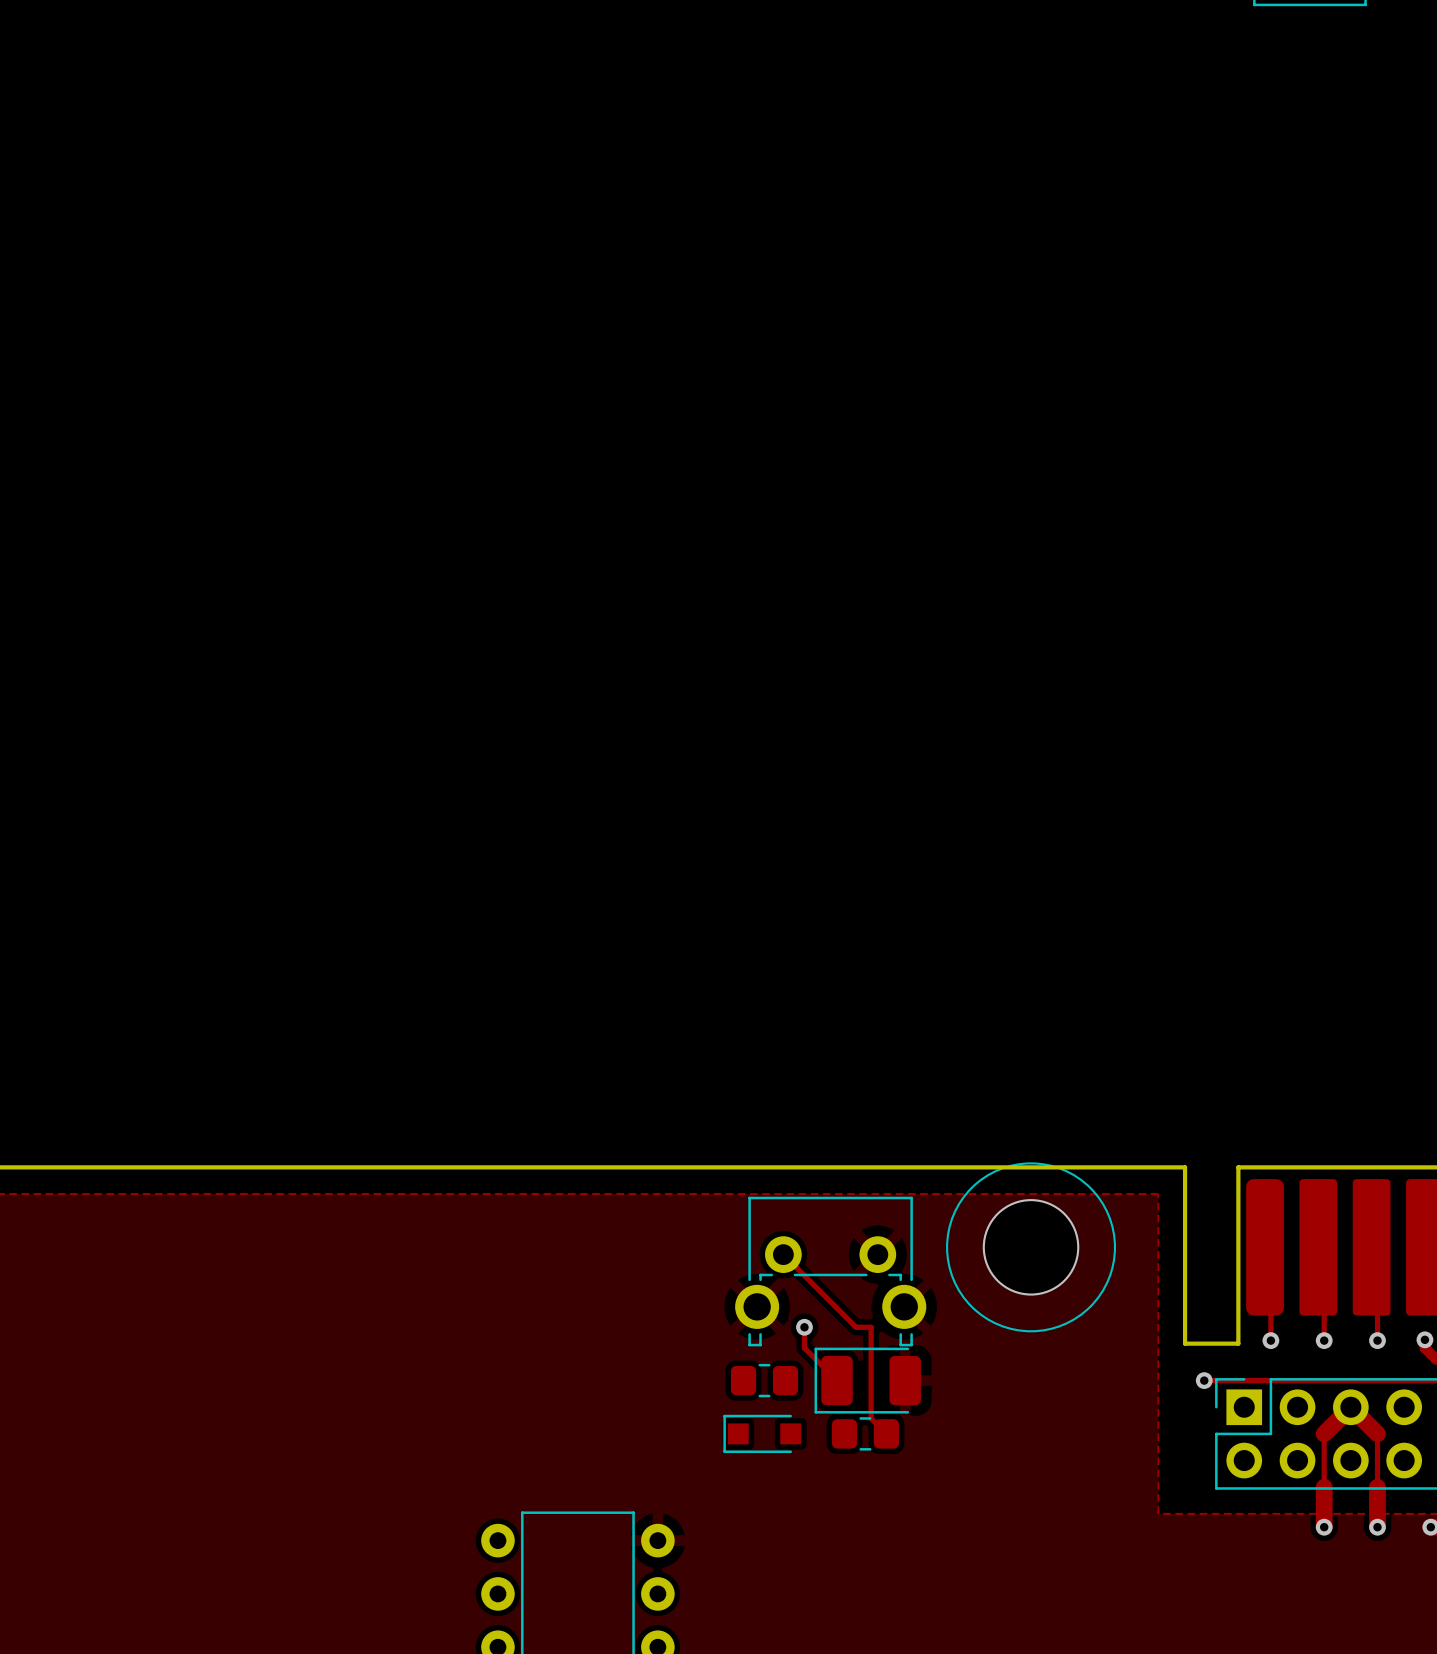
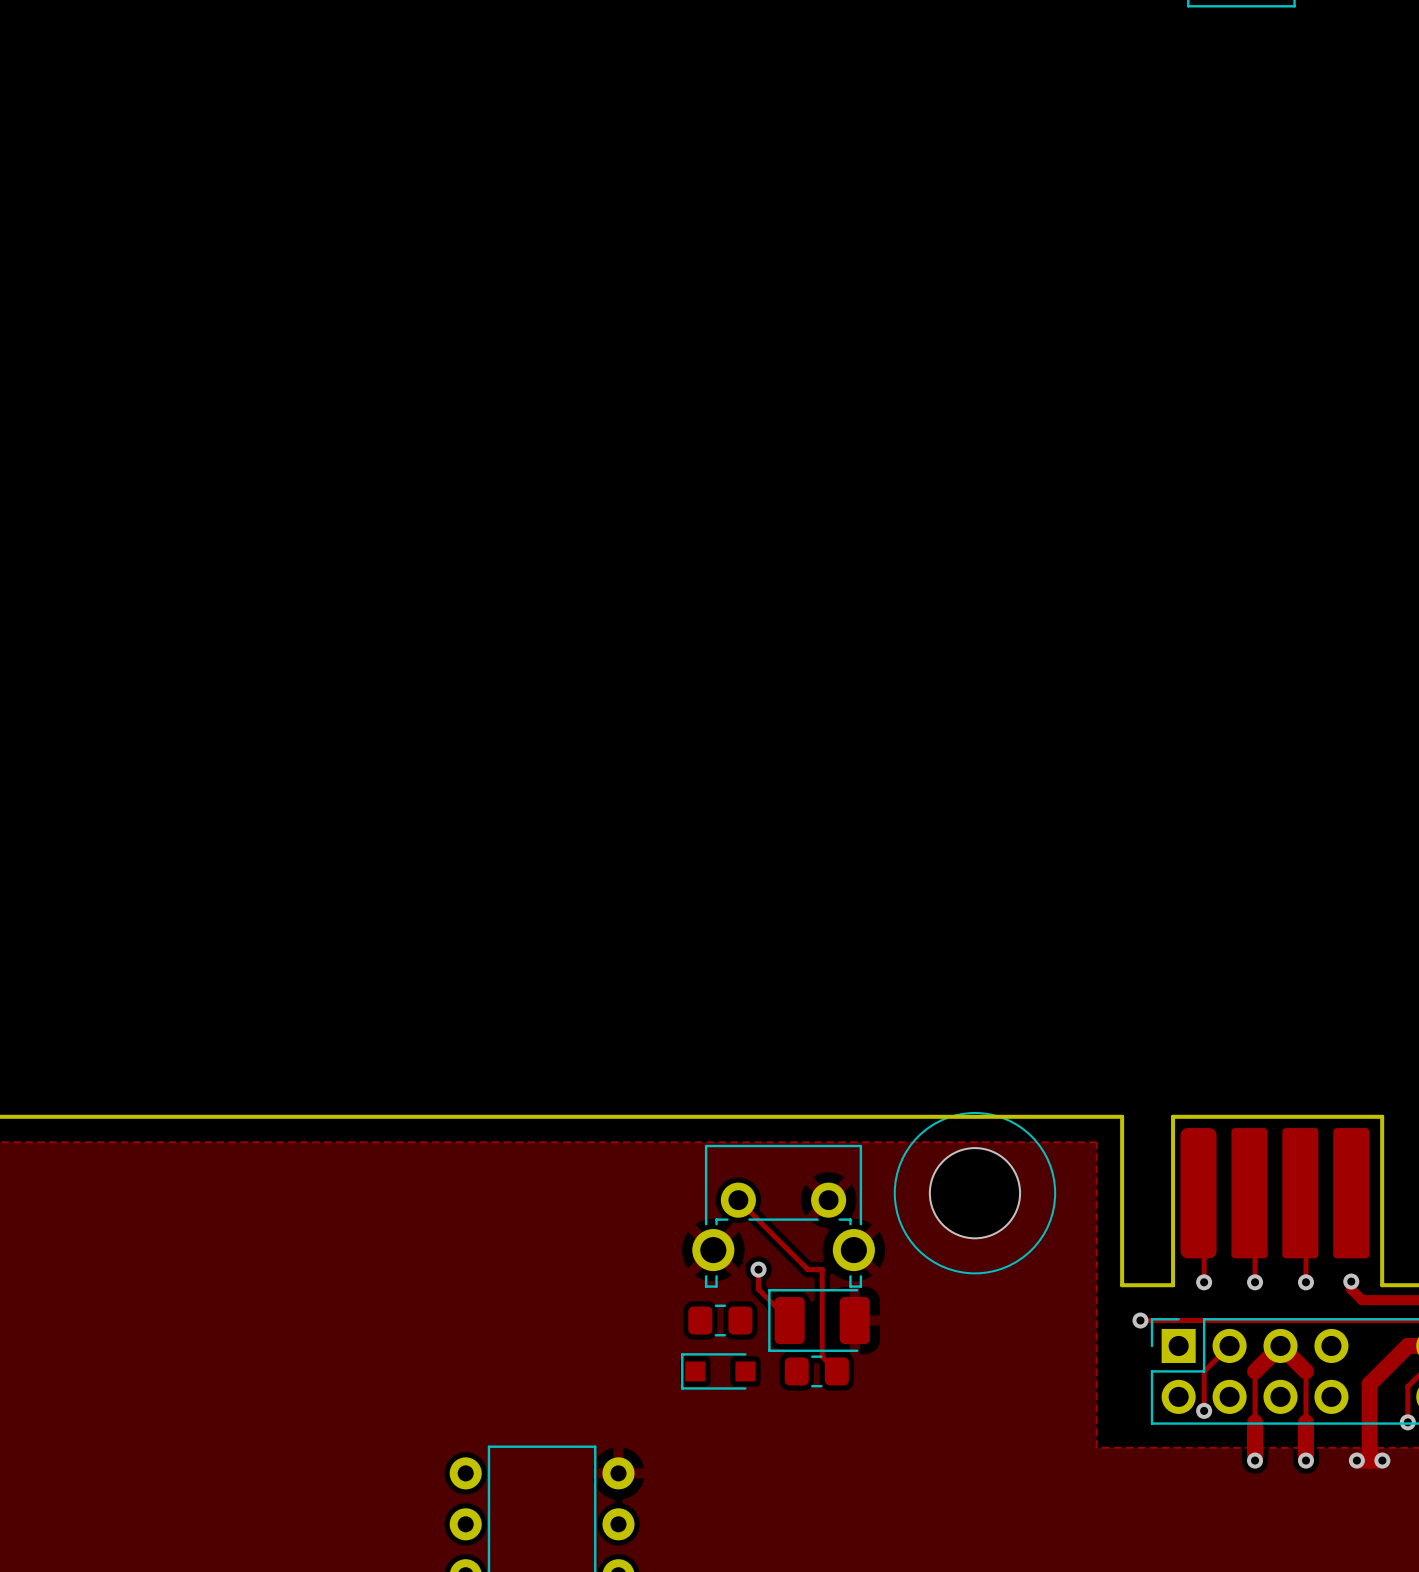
track: none -> (1229, 1345) (1204, 1371) (1204, 1410)
via: none -> (1204, 1410)

